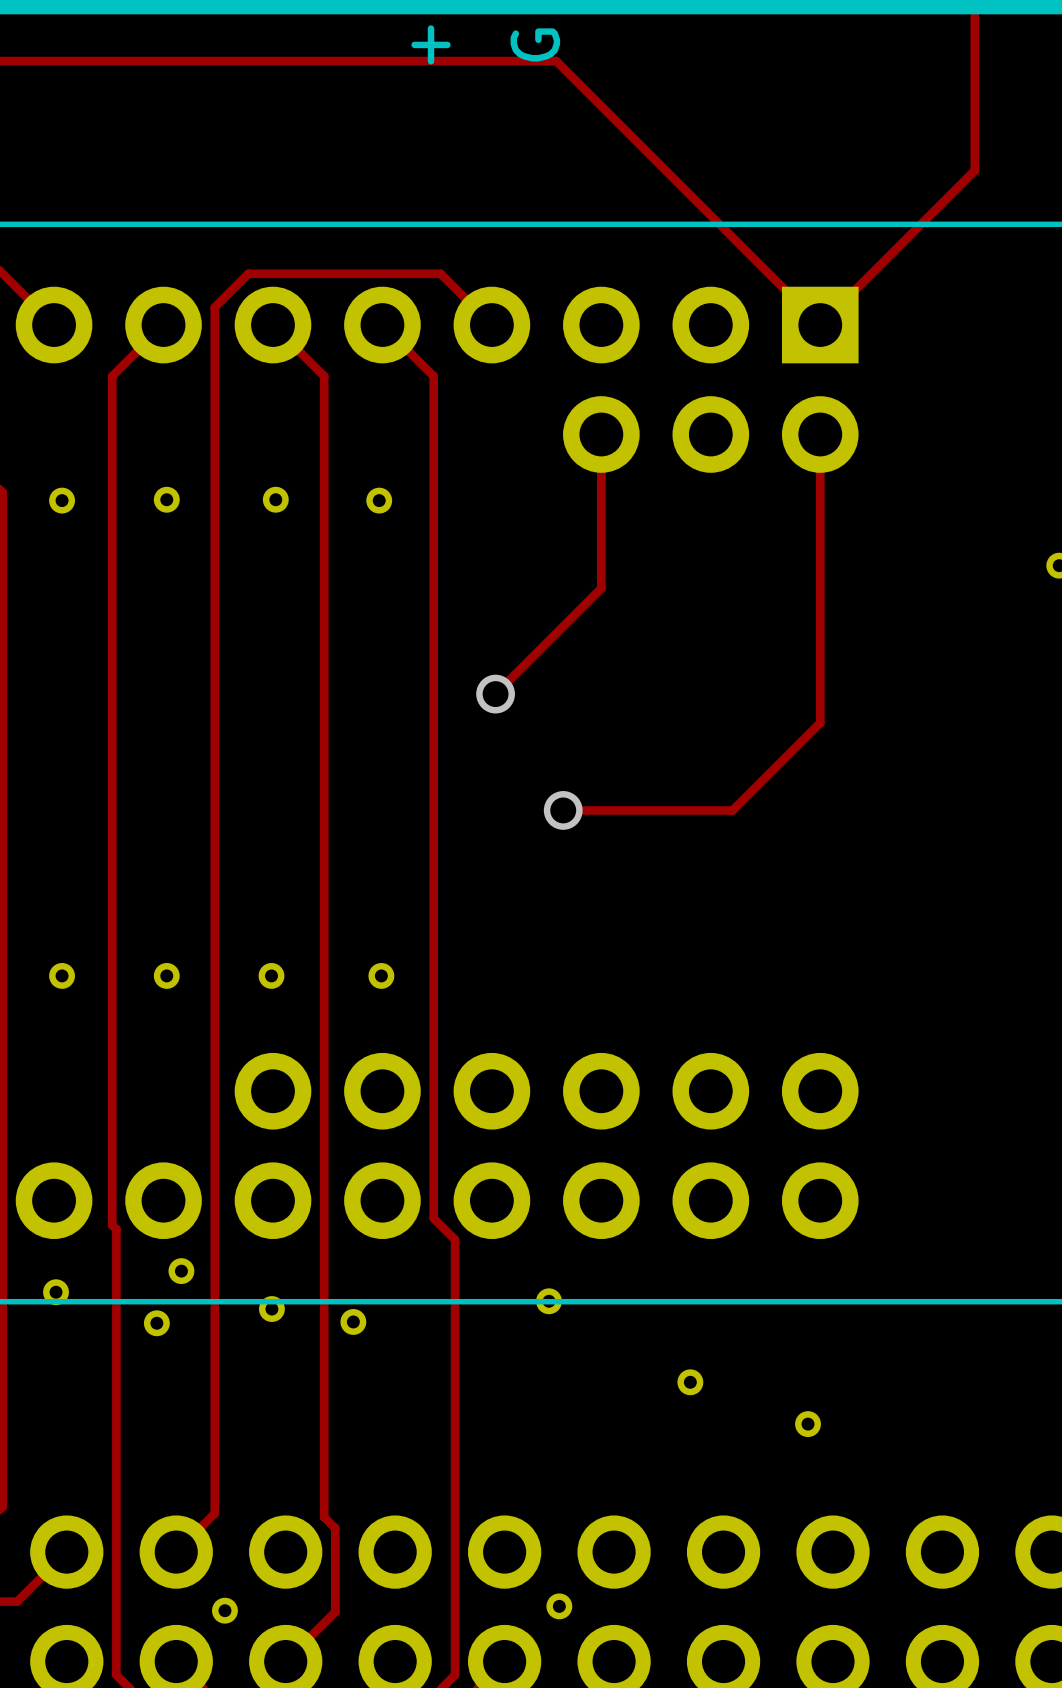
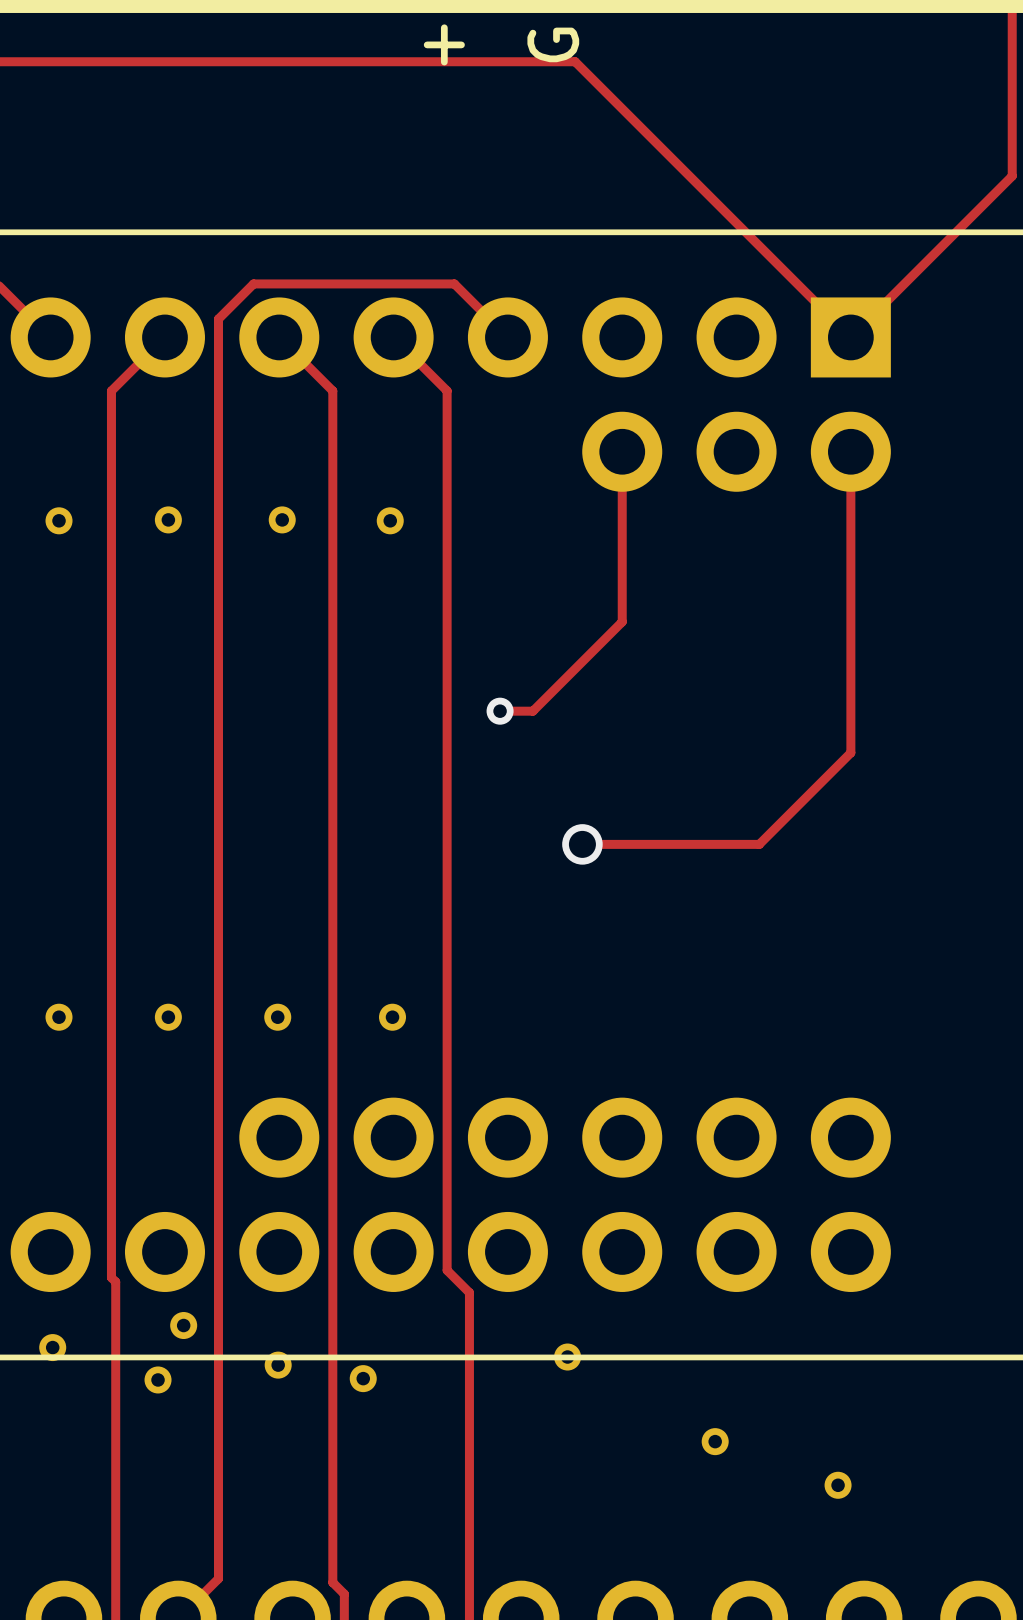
track: (601, 588) (495, 694) -> (622, 612) (622, 621) (532, 711) (500, 711)
via size: [476, 674, 515, 714] -> [486, 697, 514, 725]

